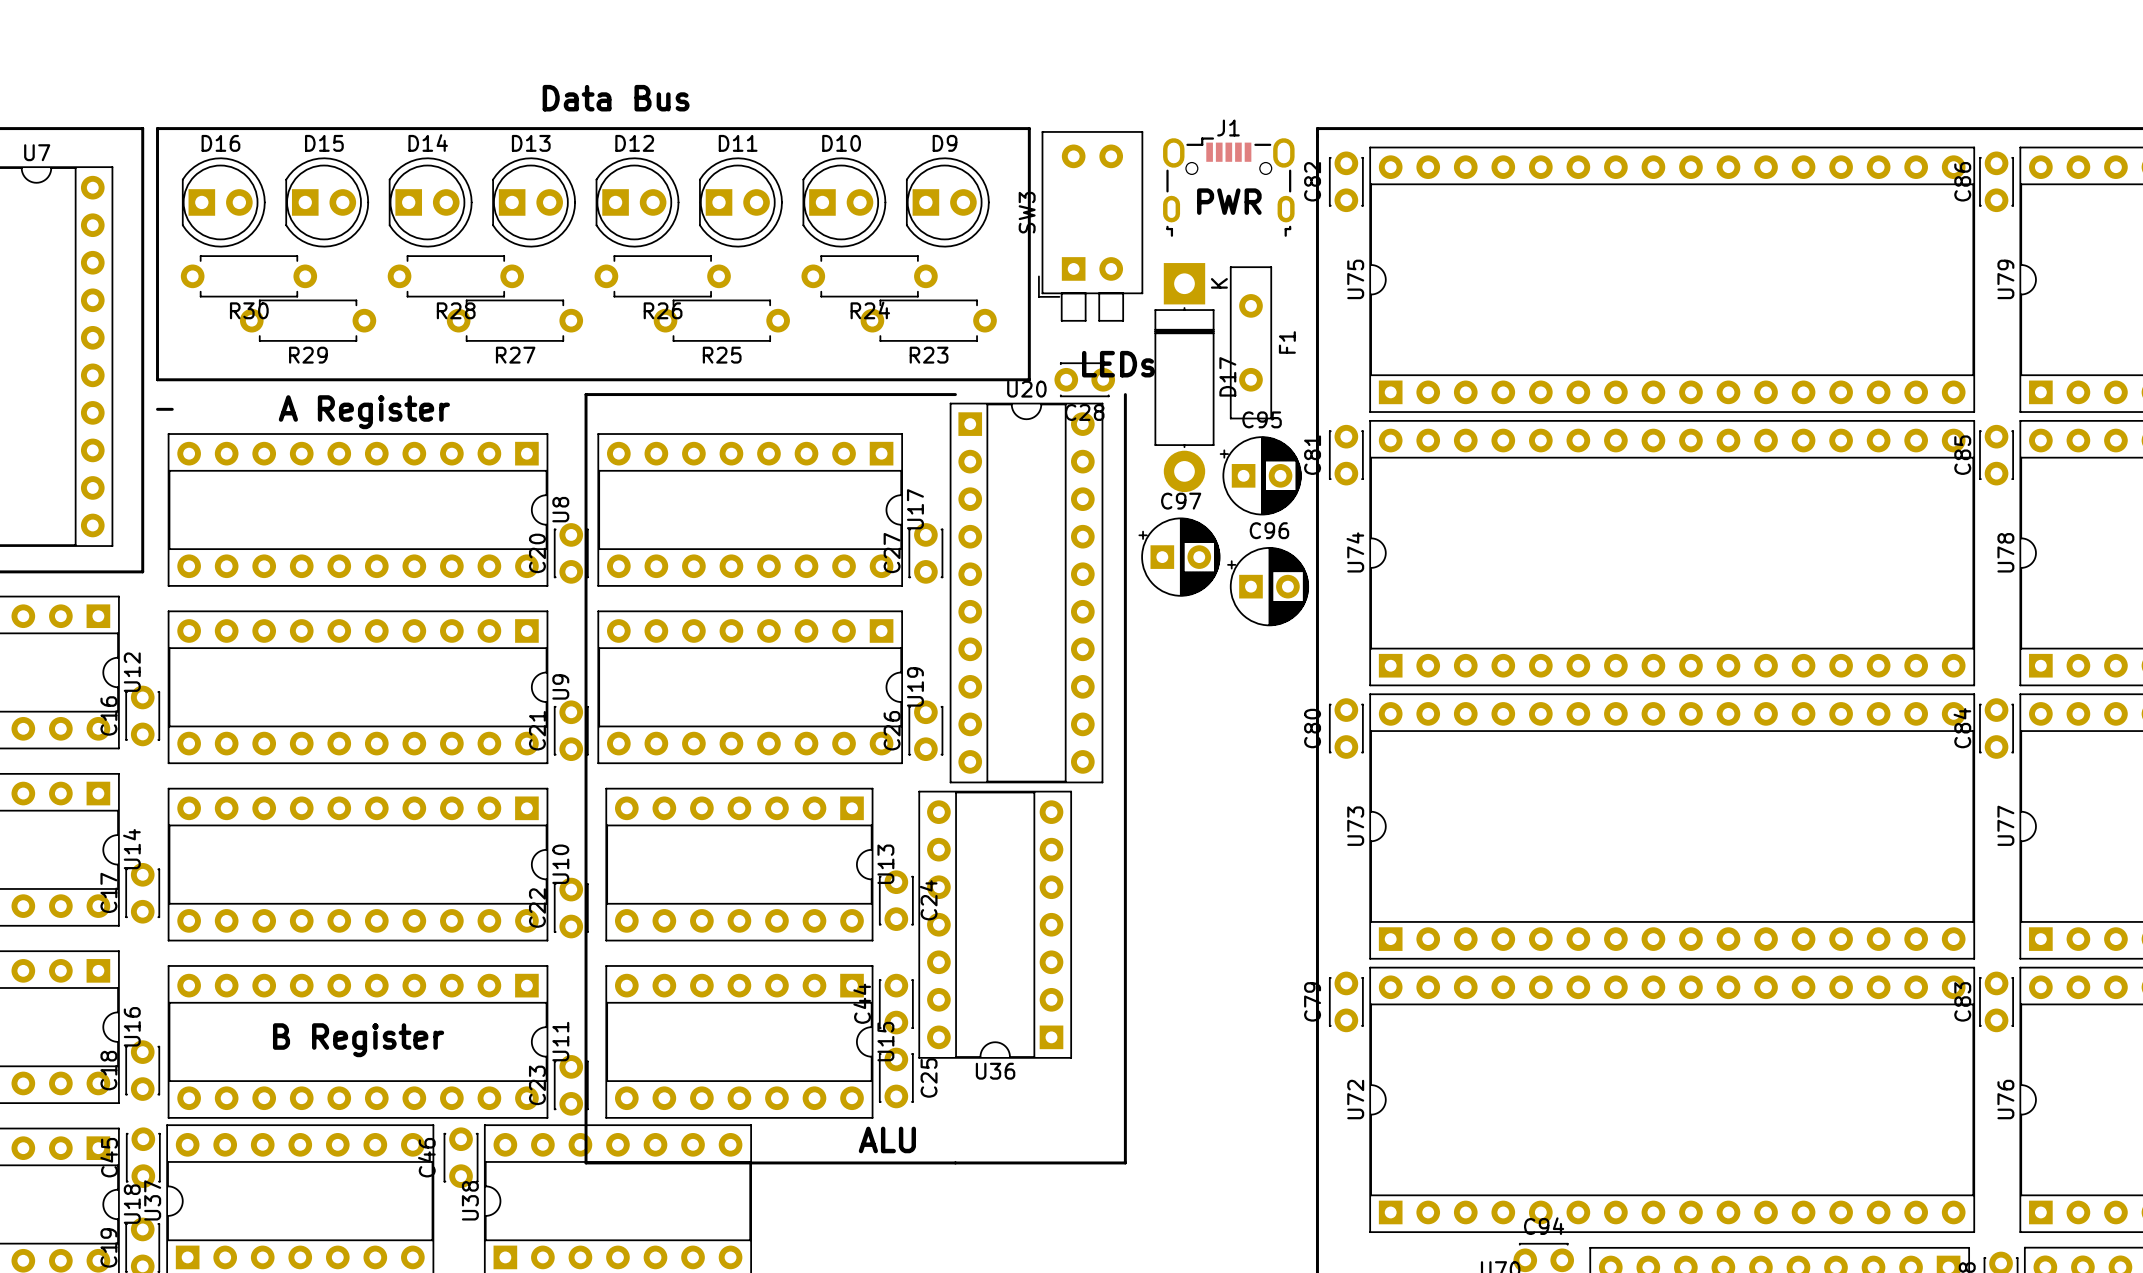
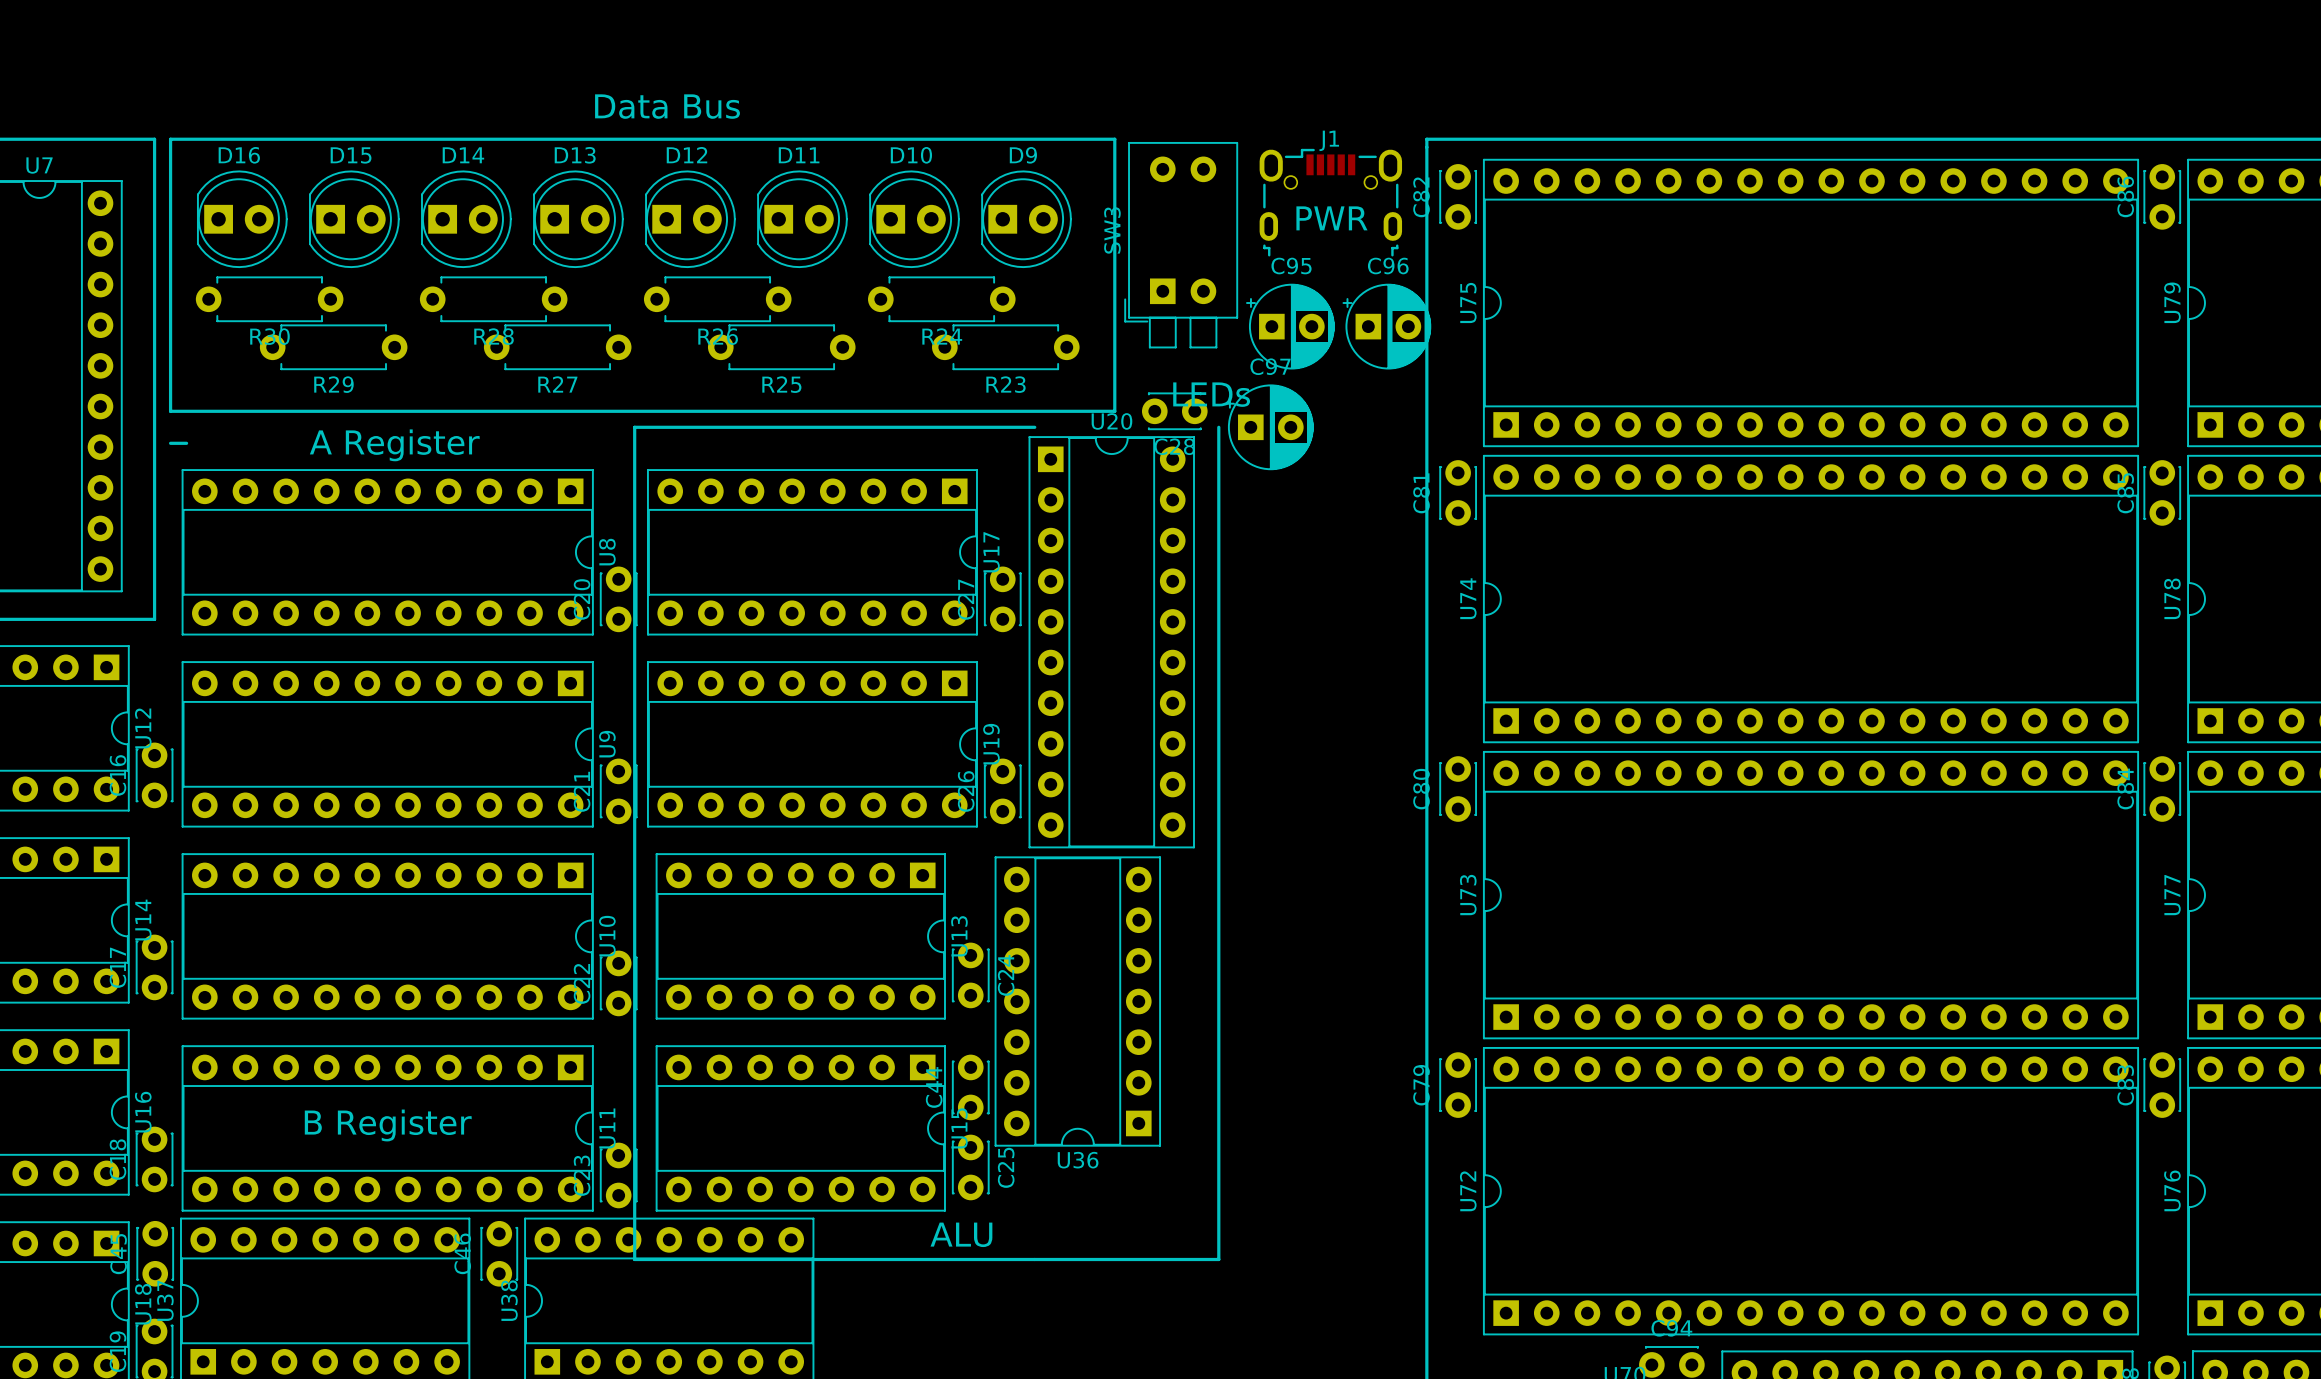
F1: (1250, 342) -> none
D17: (1184, 377) -> none
C95 position: (1260, 475) -> (1290, 326)
C97 position: (1179, 557) -> (1269, 427)
C96 position: (1268, 586) -> (1386, 326)

